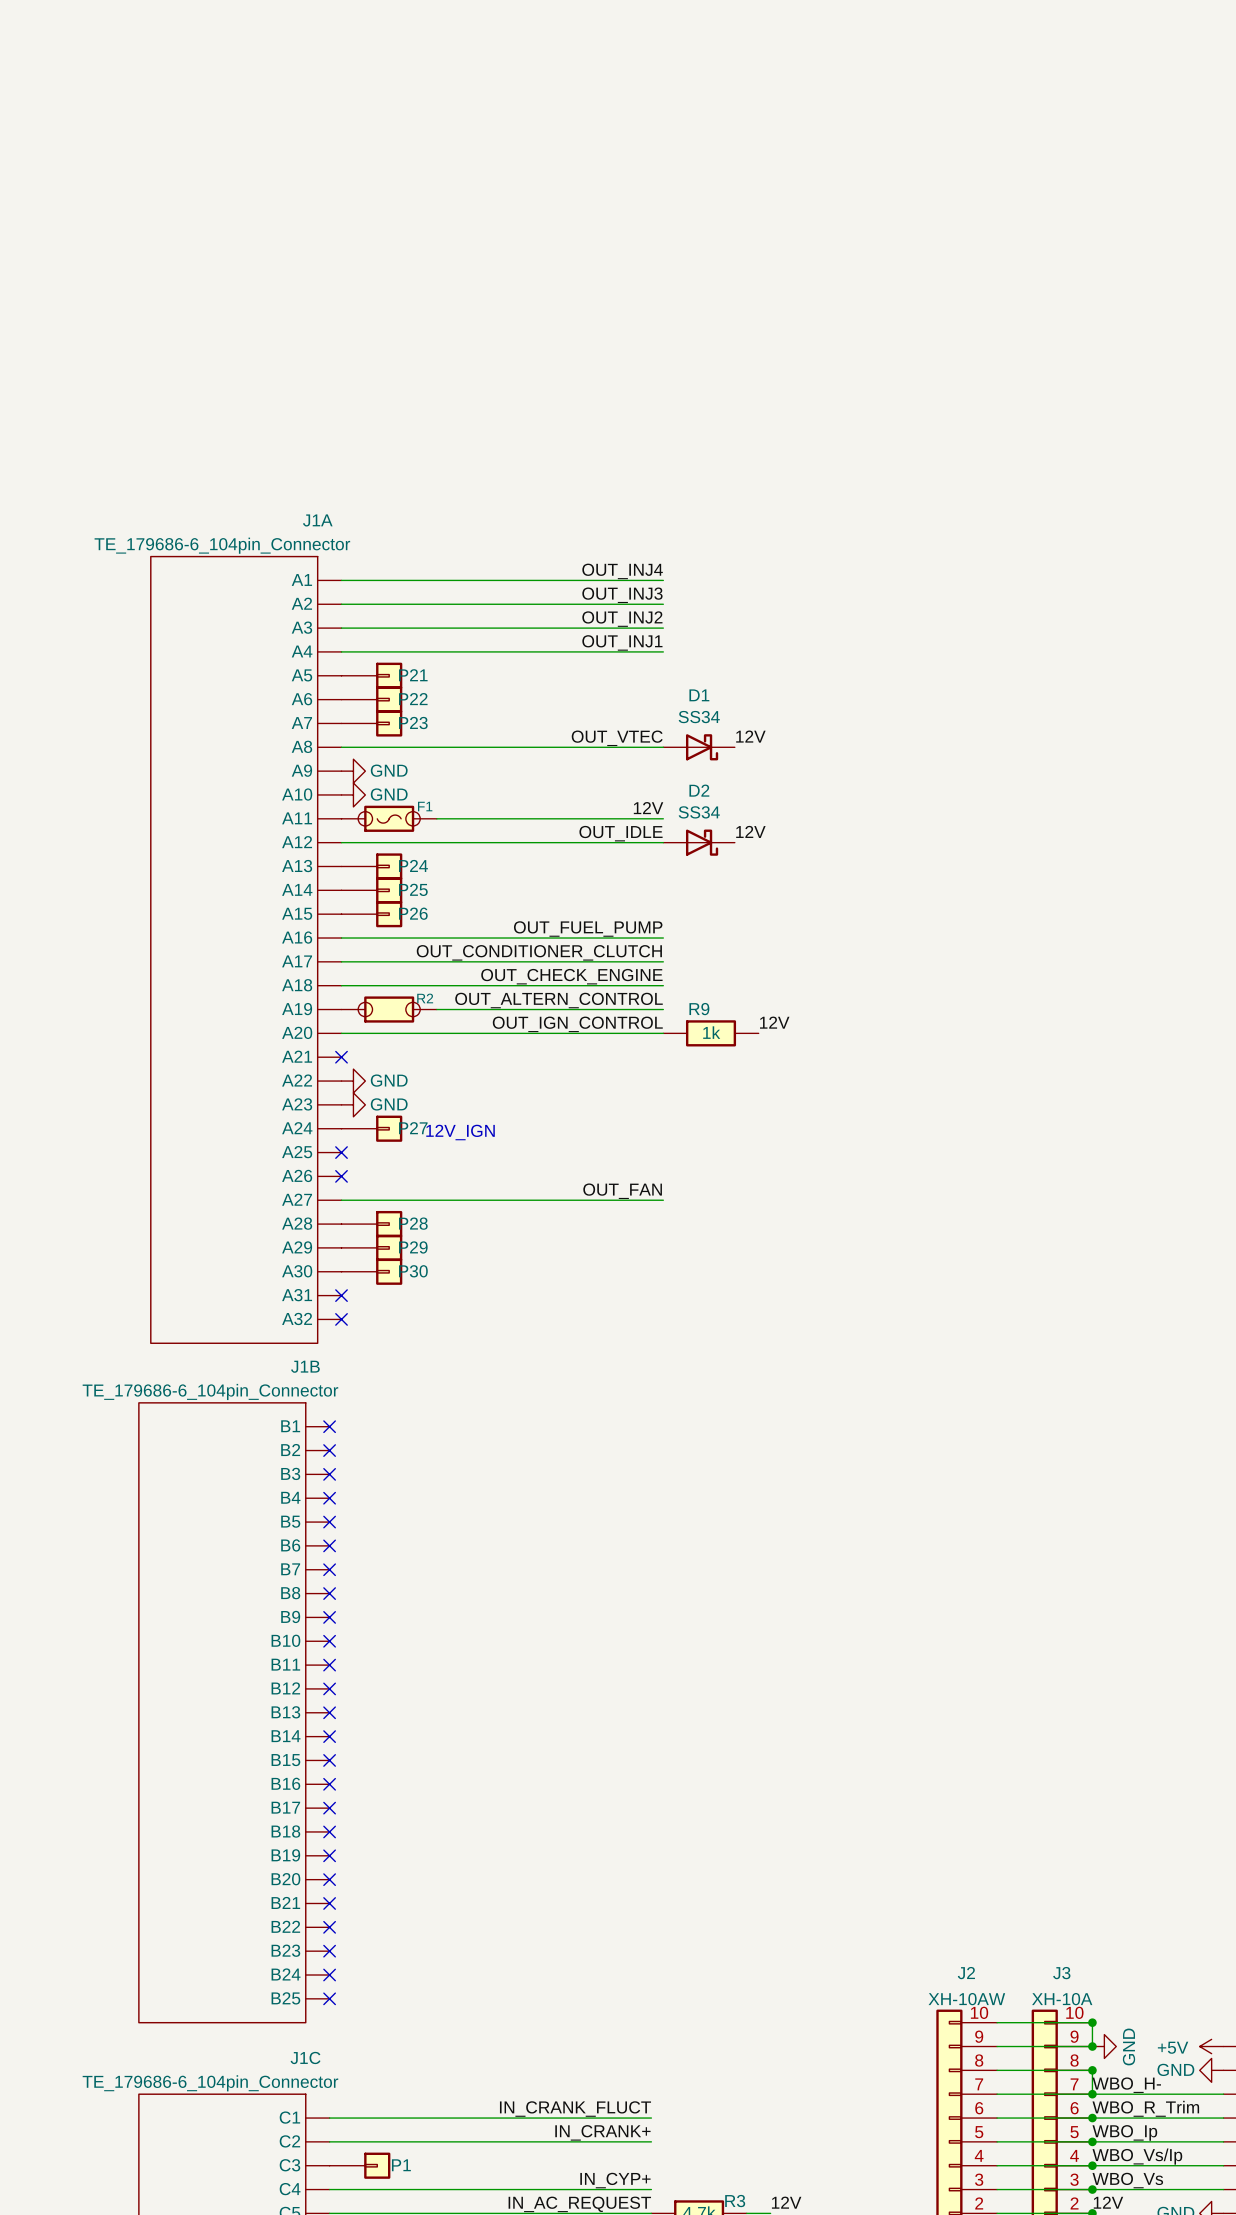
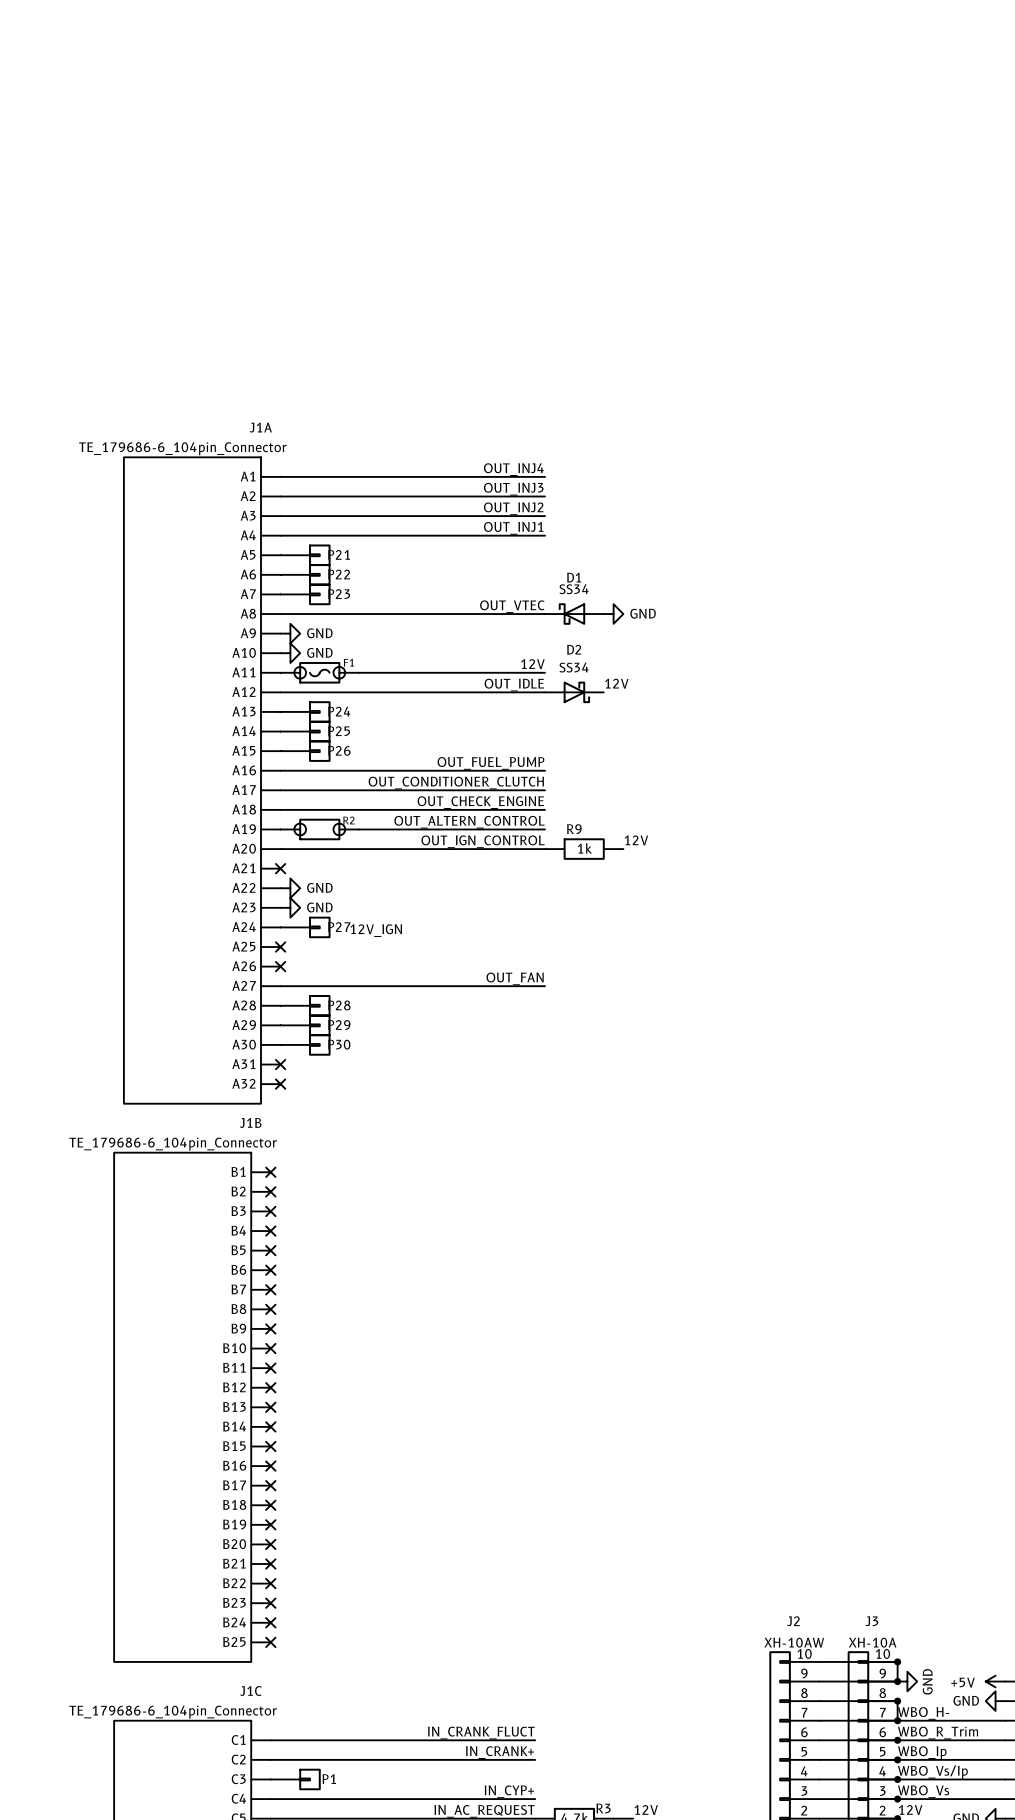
label: 12V (750, 736) -> none
D1 rotation: 0° (702, 747) -> 180° (571, 614)
power symbol: none -> GND (613, 614)

